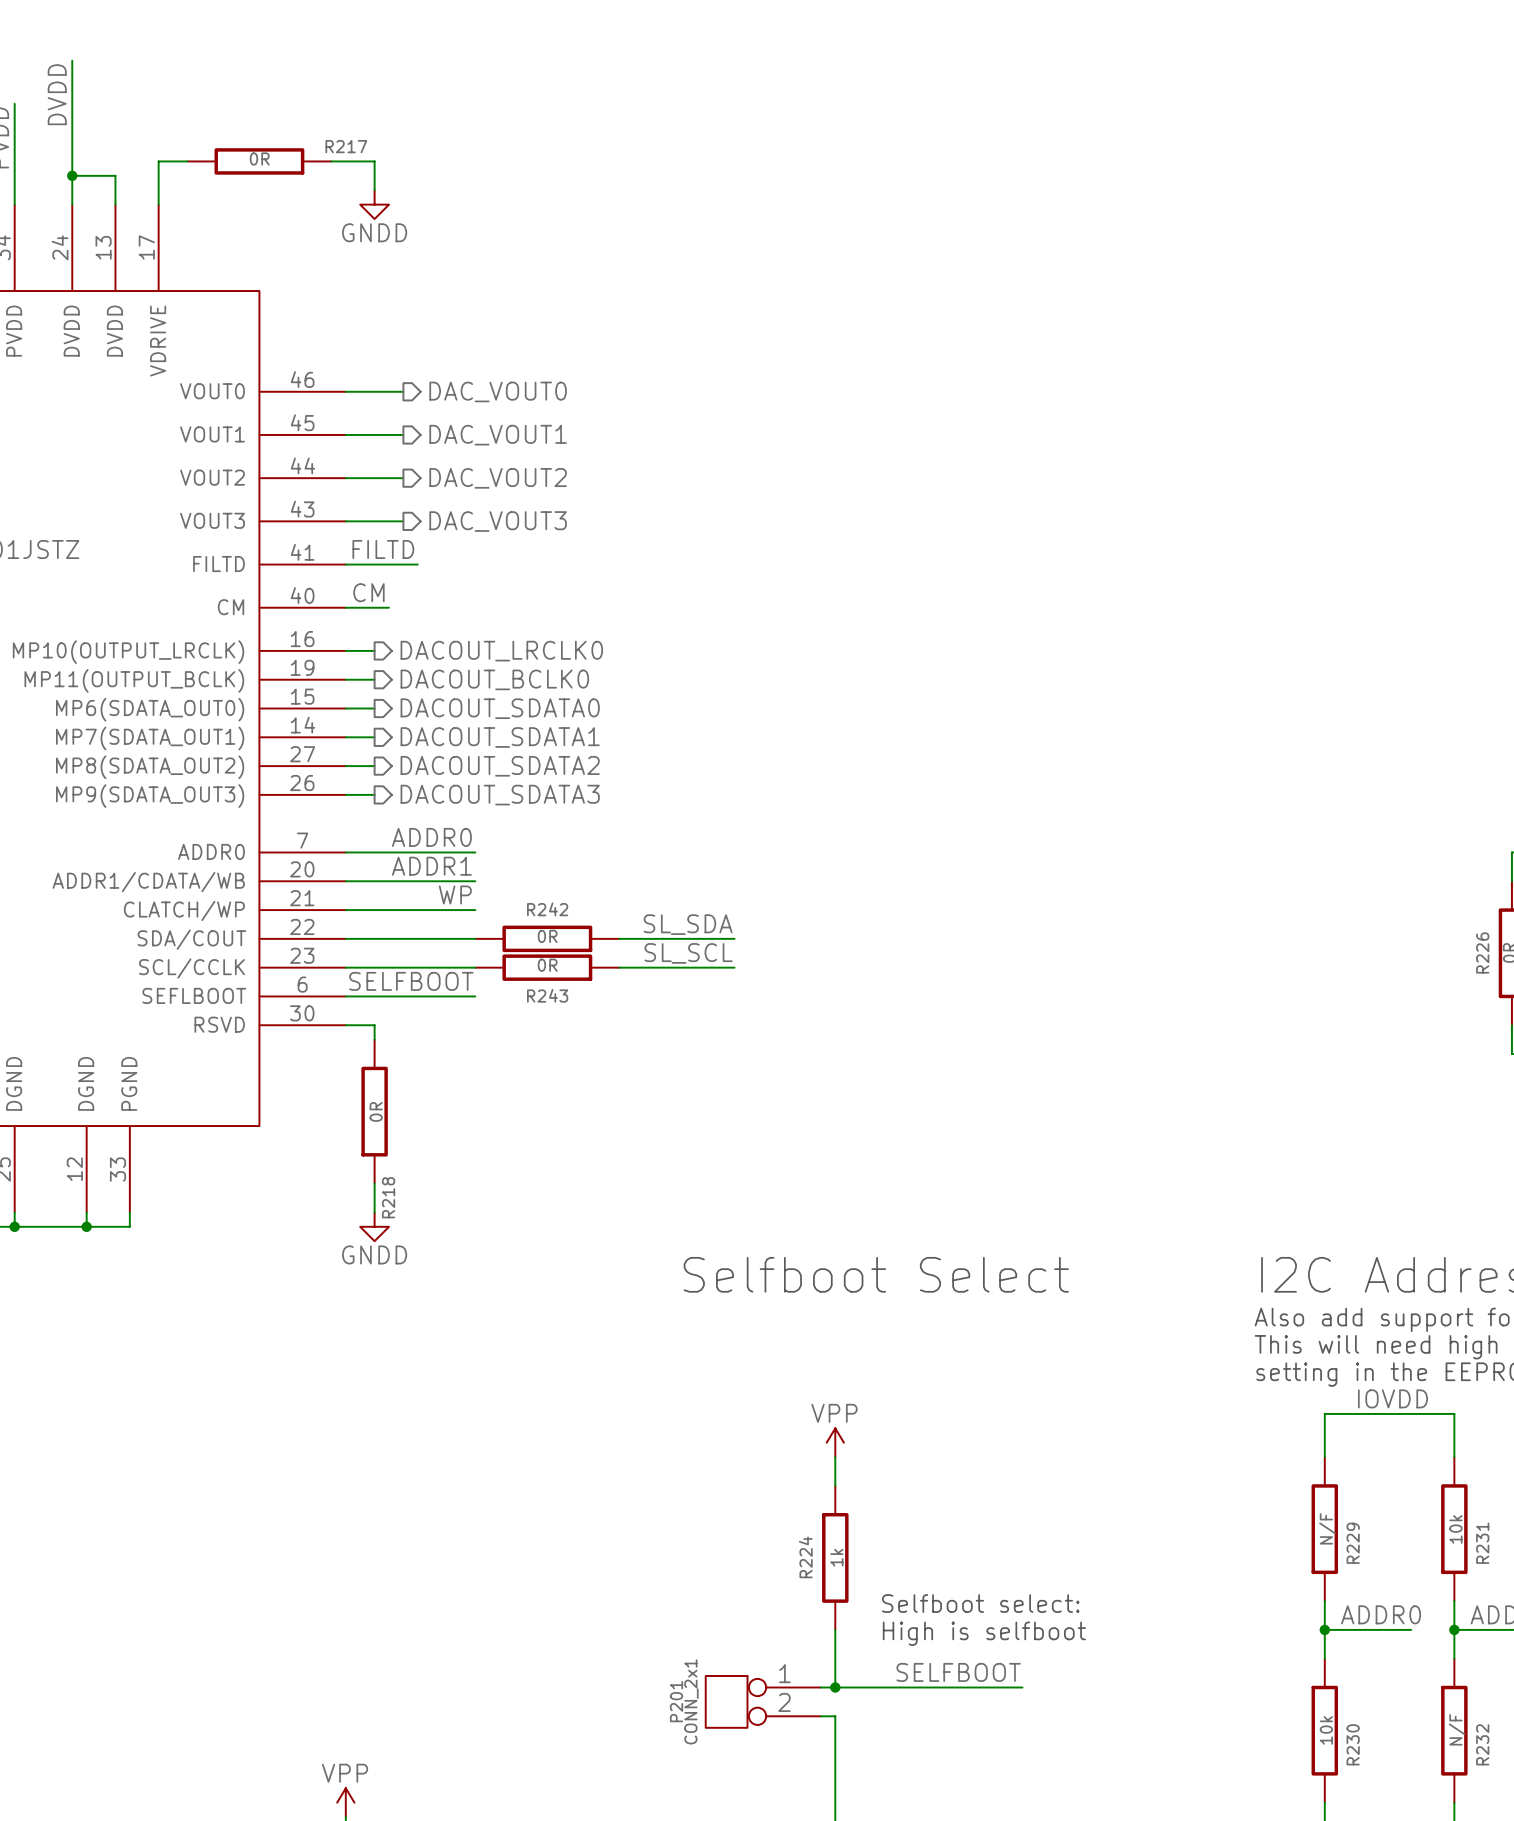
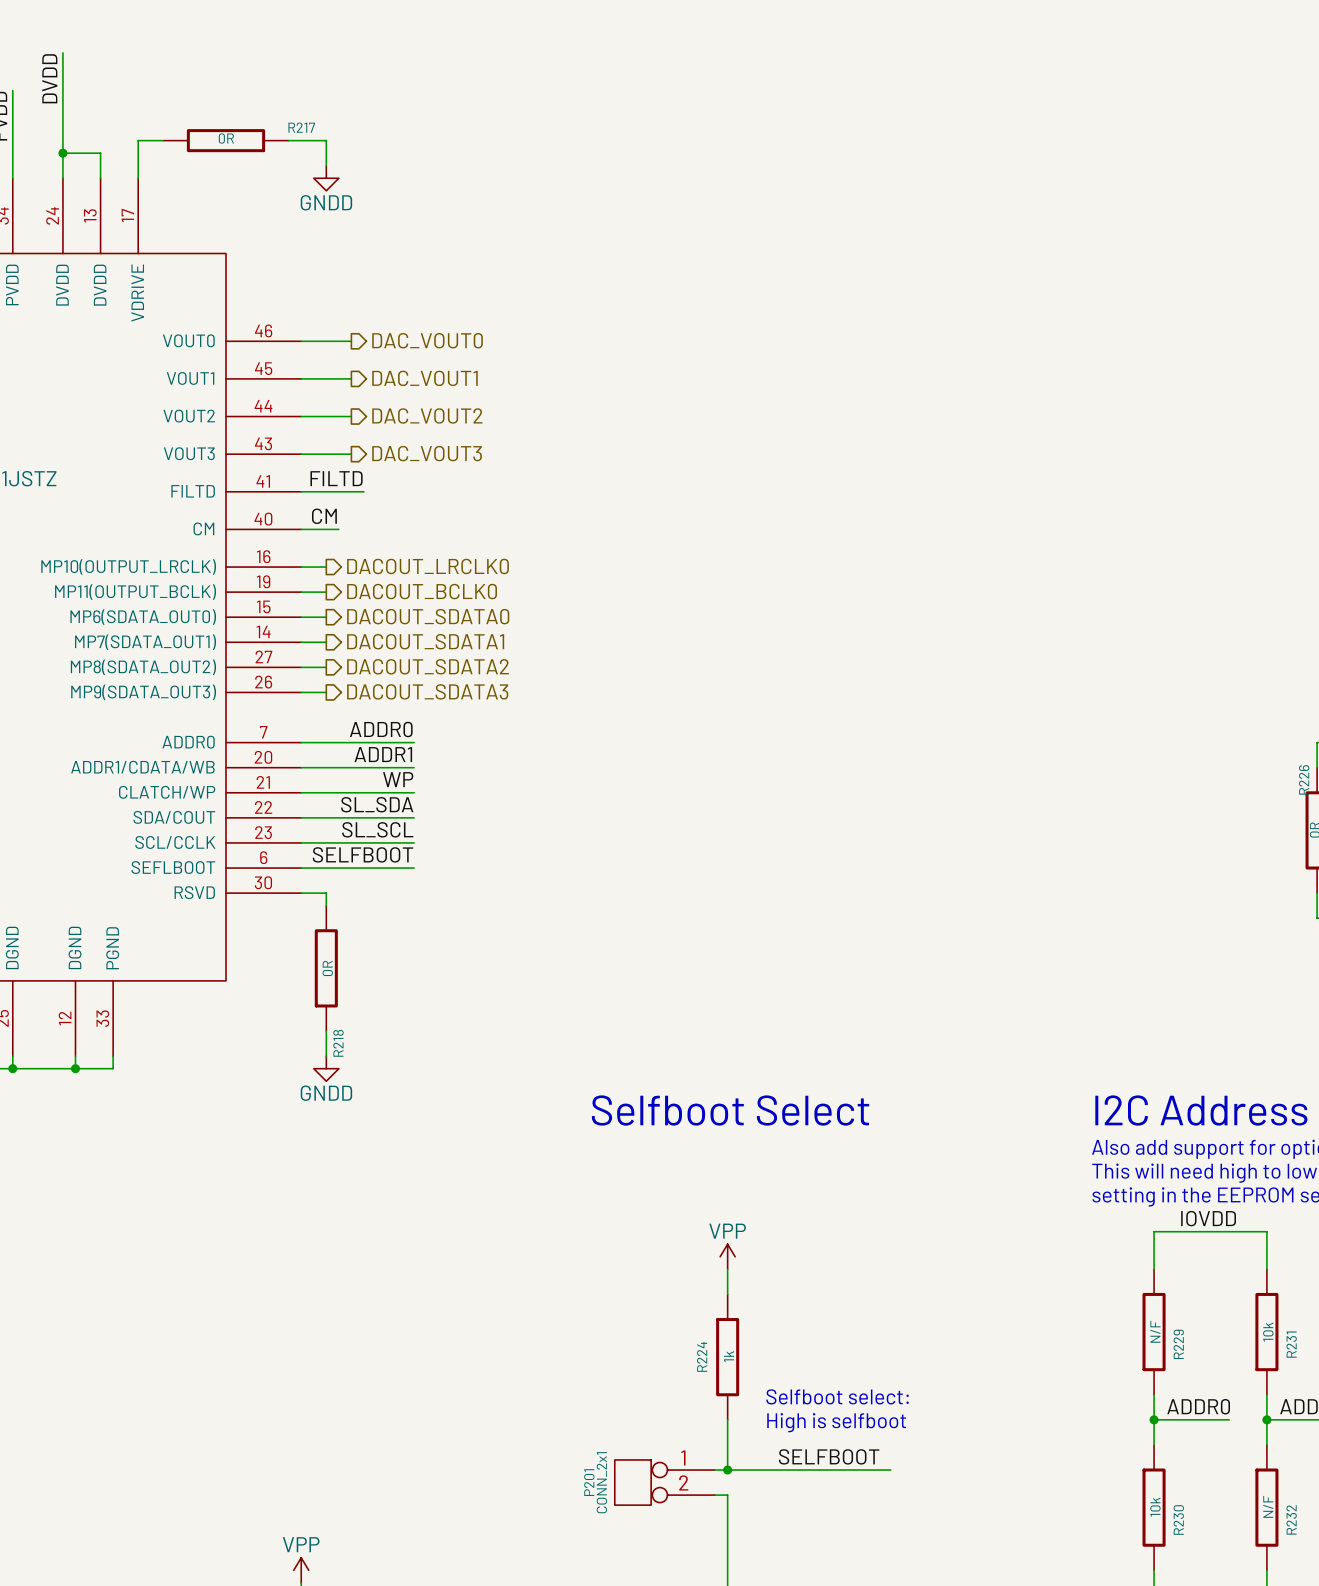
label position: SL_SDA (688, 924) -> SL_SDA (377, 804)
R242: 0R (547, 938) -> none
wire: (619, 938) (734, 938) -> none
R226 name position: R226 (1482, 952) -> R226 (1304, 779)
label position: SL_SCL (688, 953) -> SL_SCL (377, 829)
R243: 0R (547, 967) -> none
wire: (619, 967) (734, 967) -> none

